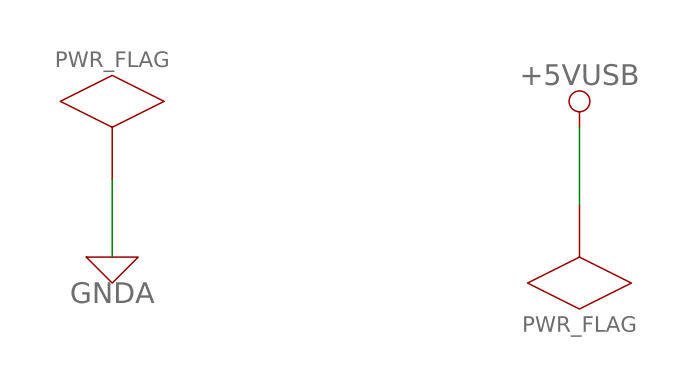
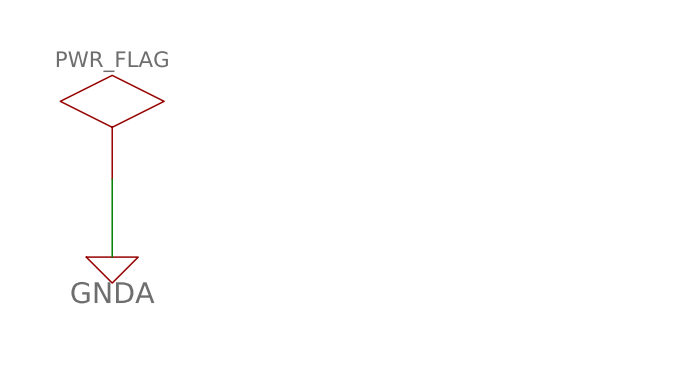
power symbol: +5VUSB (579, 109) -> none
wire: (579, 127) (579, 205) -> none
power symbol: PWR_FLAG (579, 257) -> none

